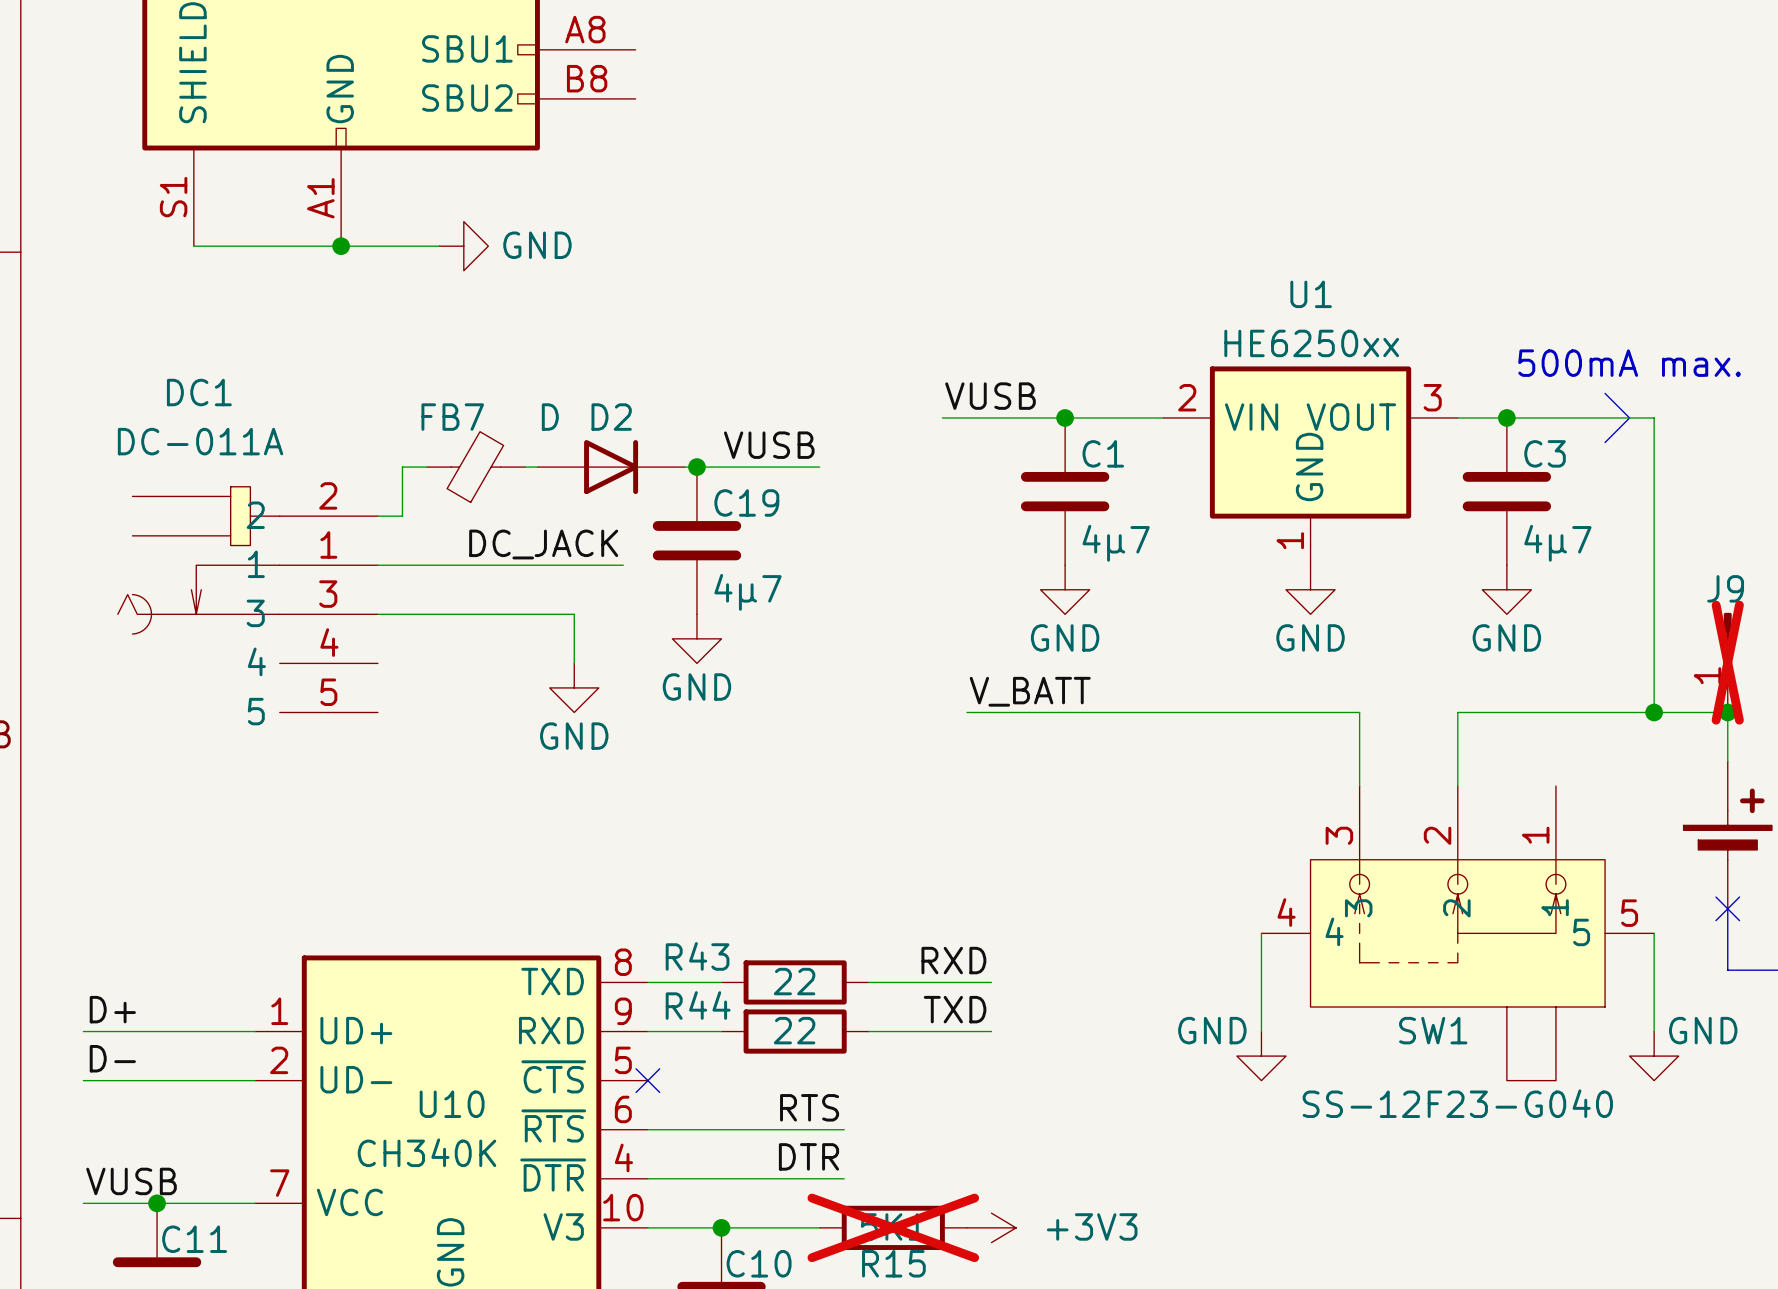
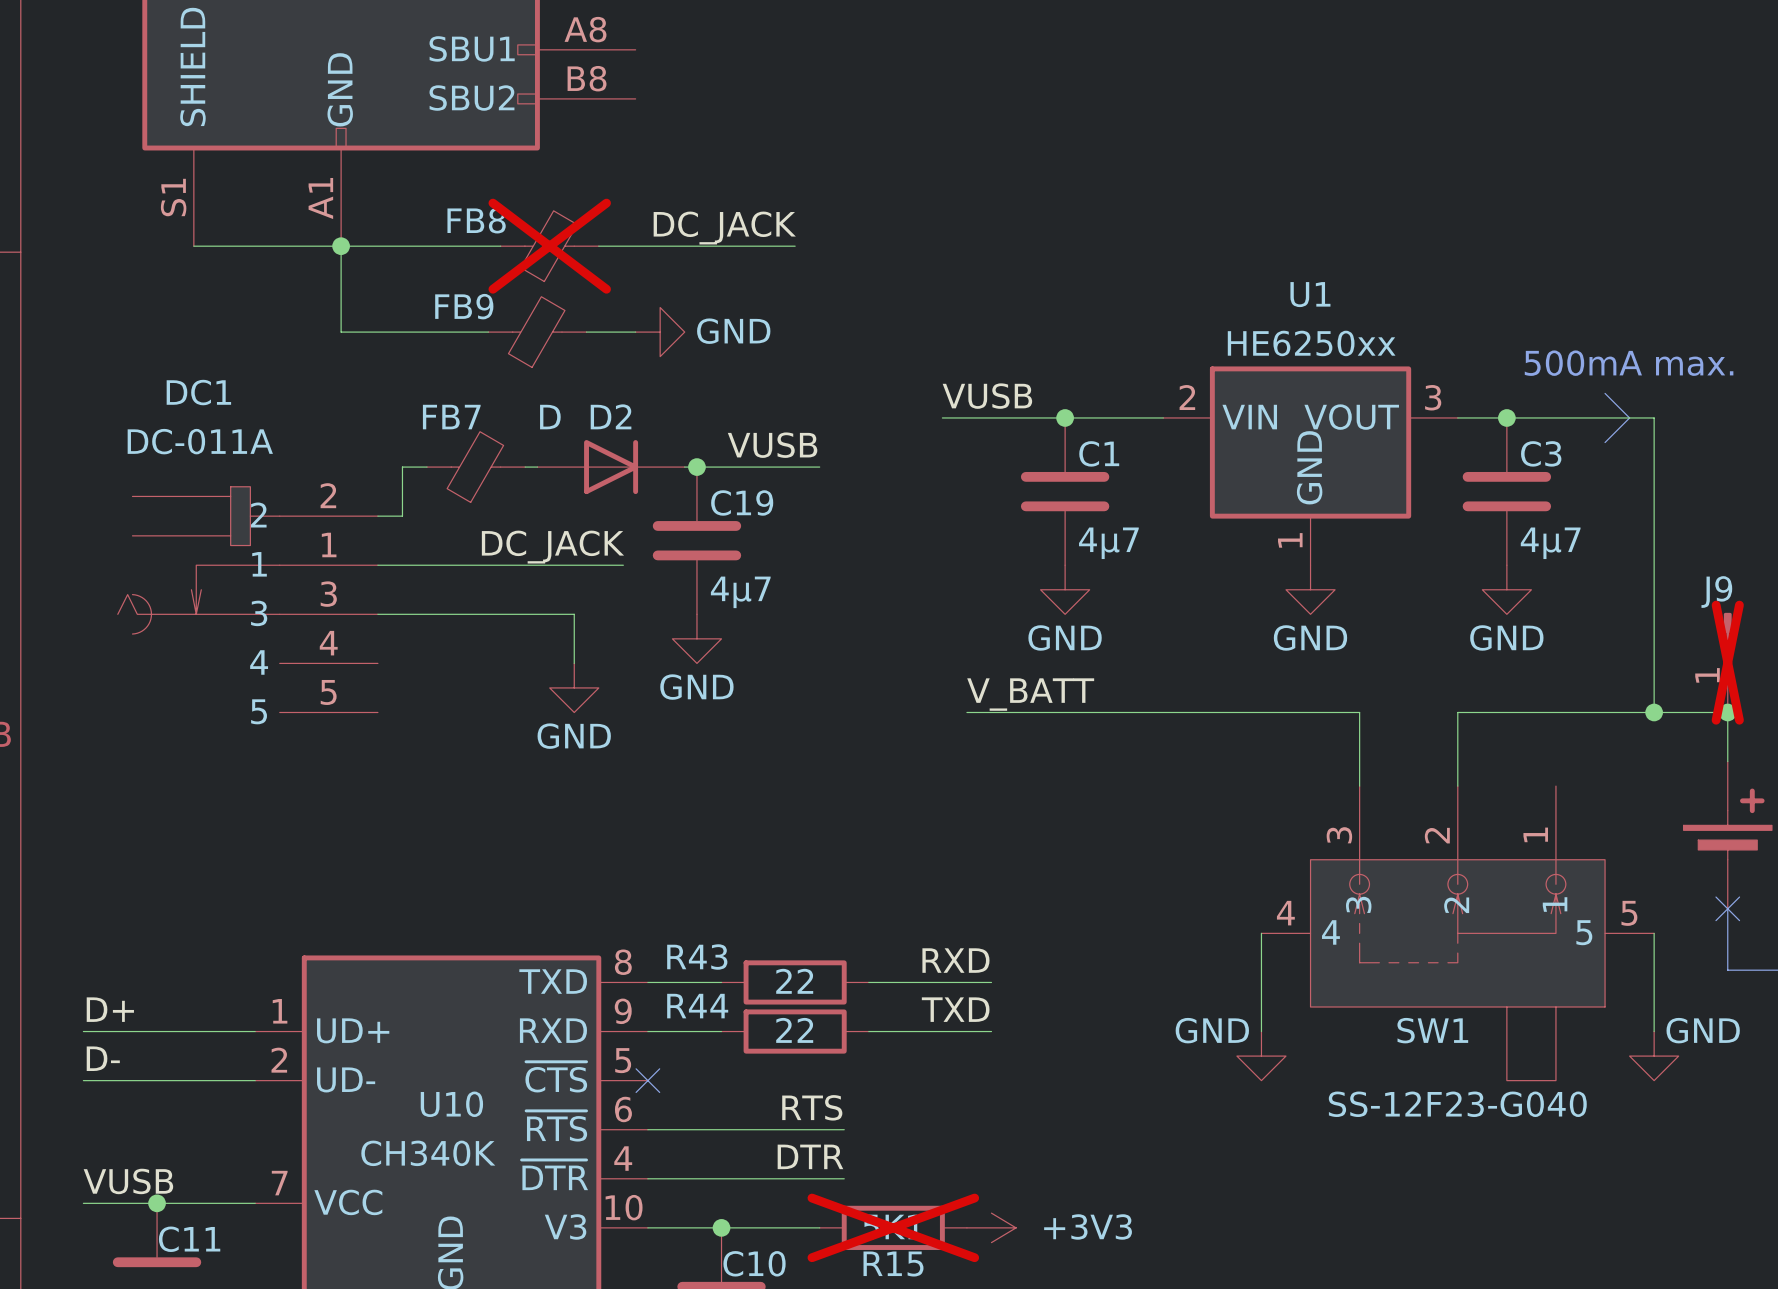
label: none -> DC_JACK (724, 228)
wire: none -> (341, 246) (341, 332) (488, 332)
wire: none -> (439, 246) (500, 246)
power symbol position: GND (463, 246) -> GND (660, 332)
FB8: none -> (549, 246)
wire: none -> (598, 246) (795, 246)
FB9: none -> (537, 332)
wire: none -> (586, 332) (635, 332)

